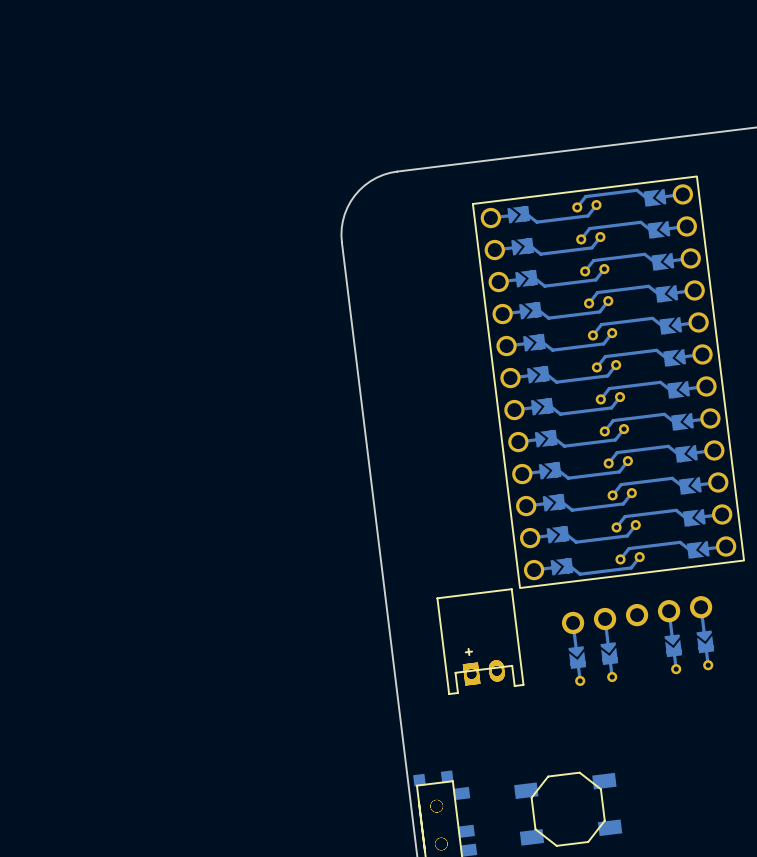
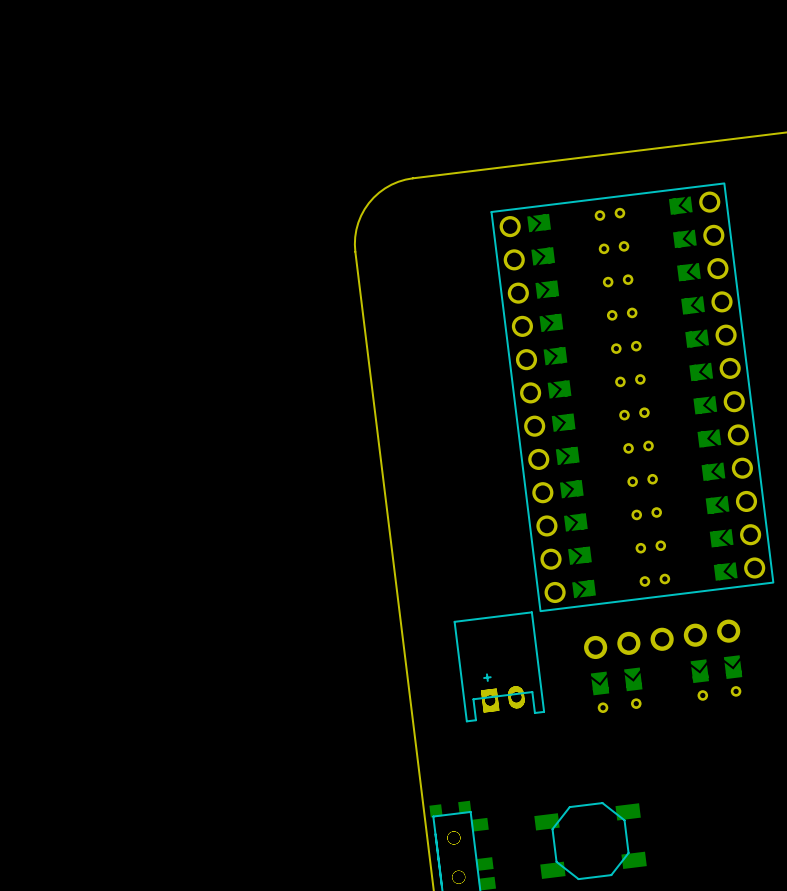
part footprint: [471, 175, 746, 589] -> [490, 182, 775, 613]
part footprint: [561, 596, 715, 687] -> [584, 619, 743, 714]

